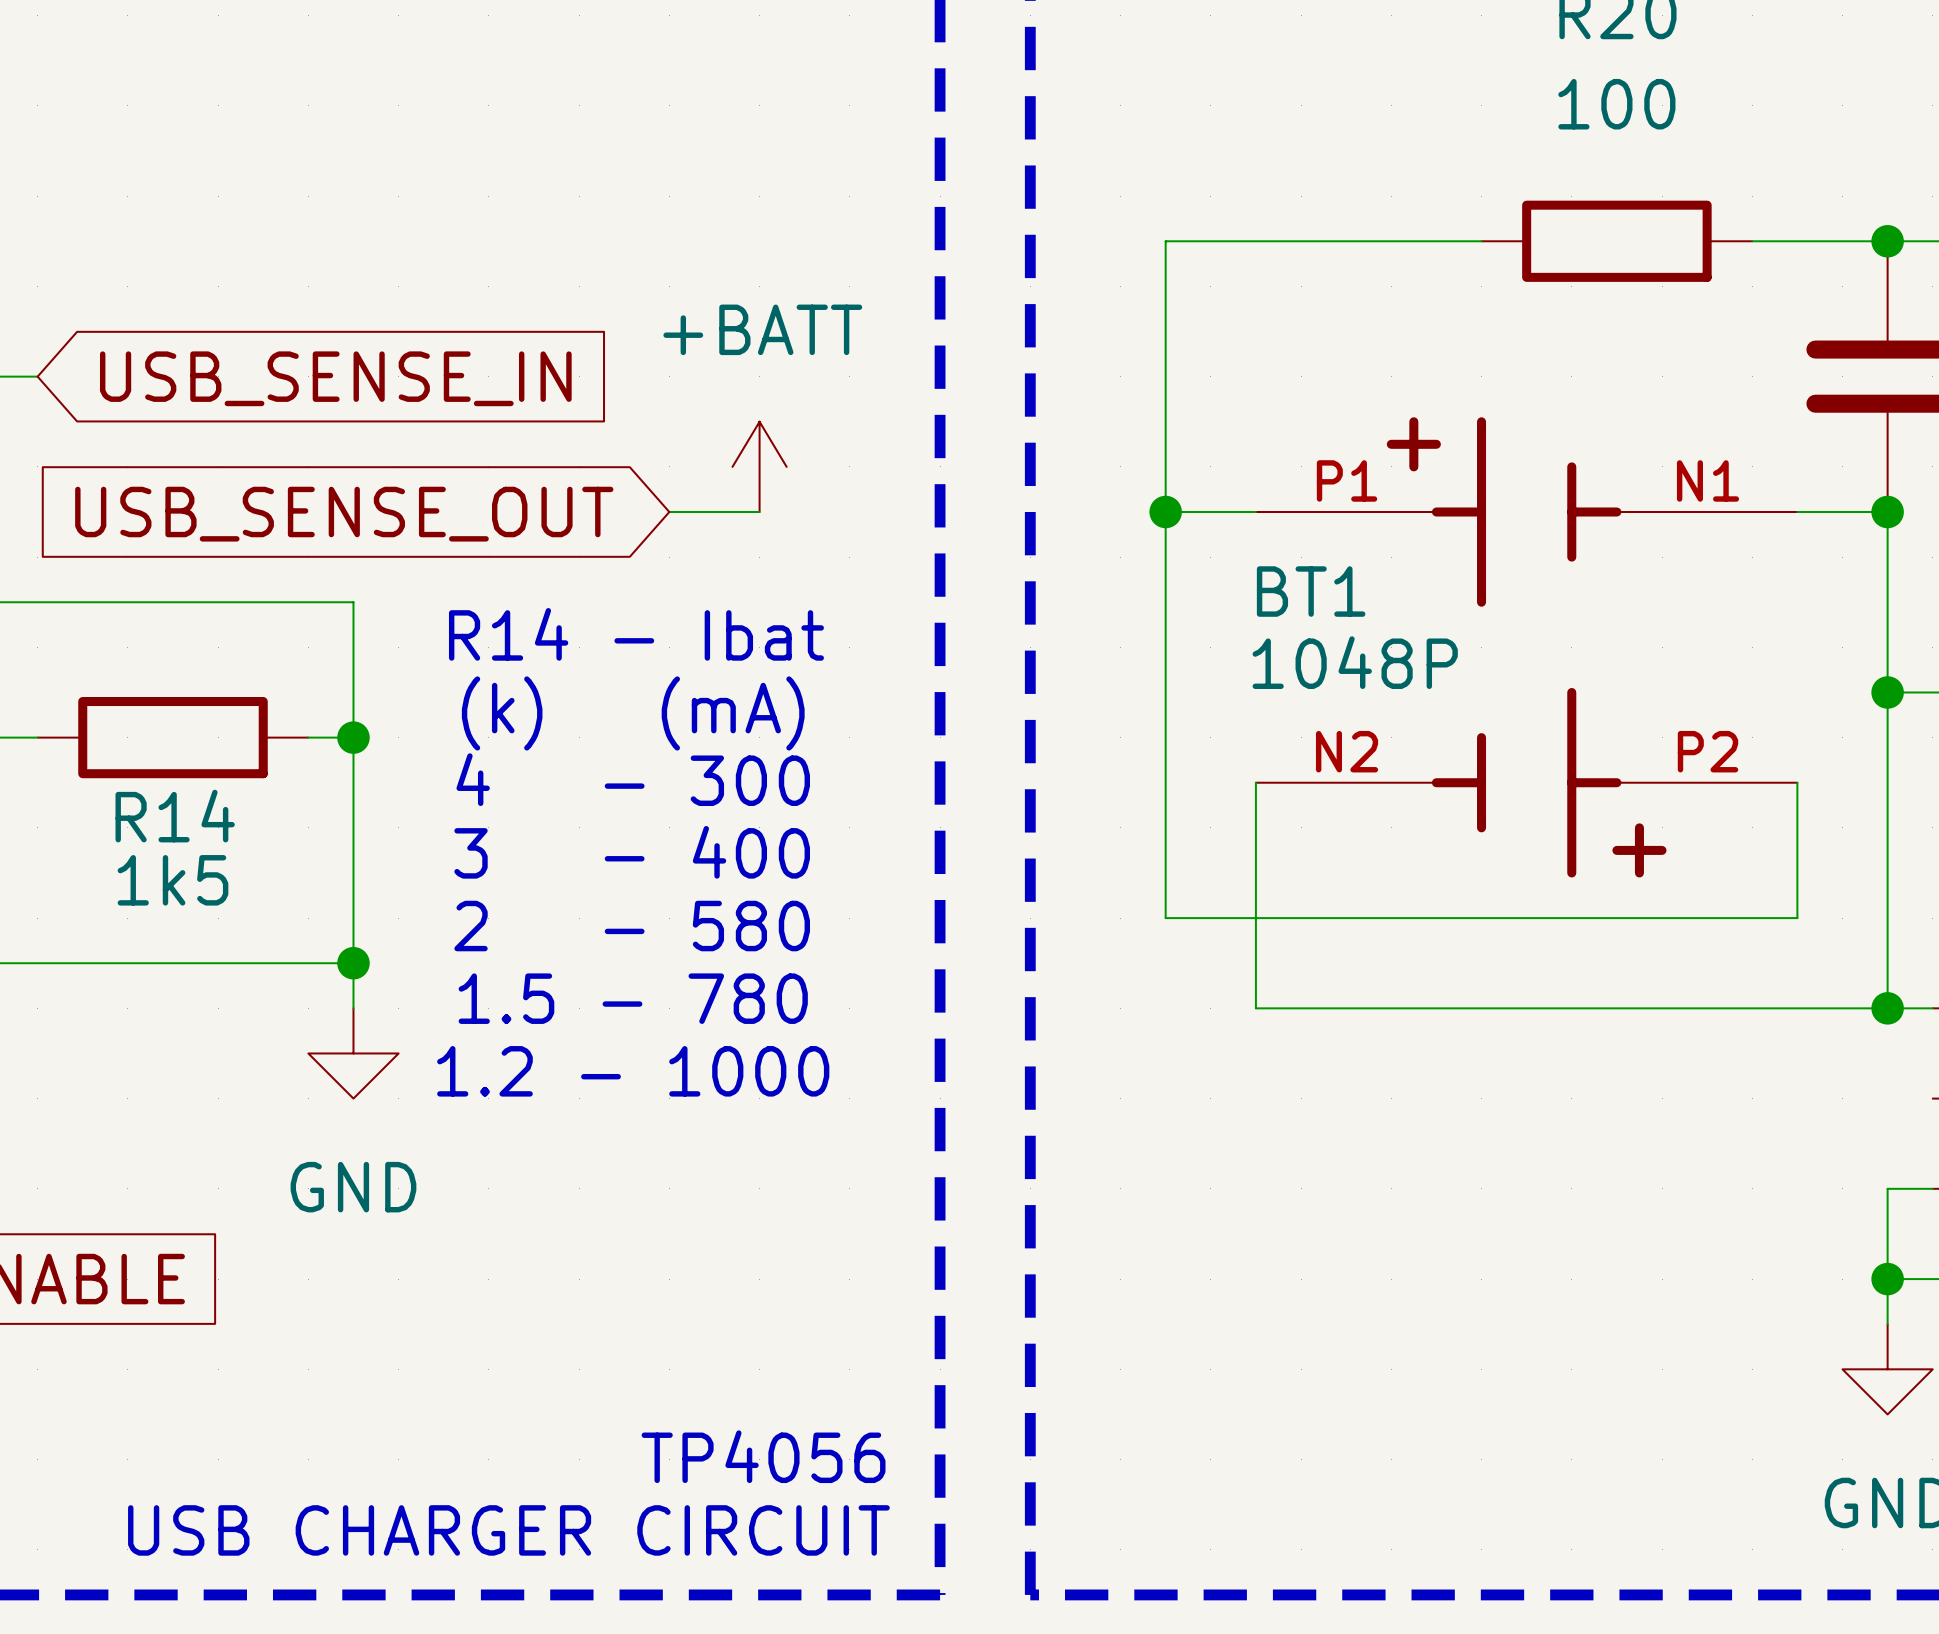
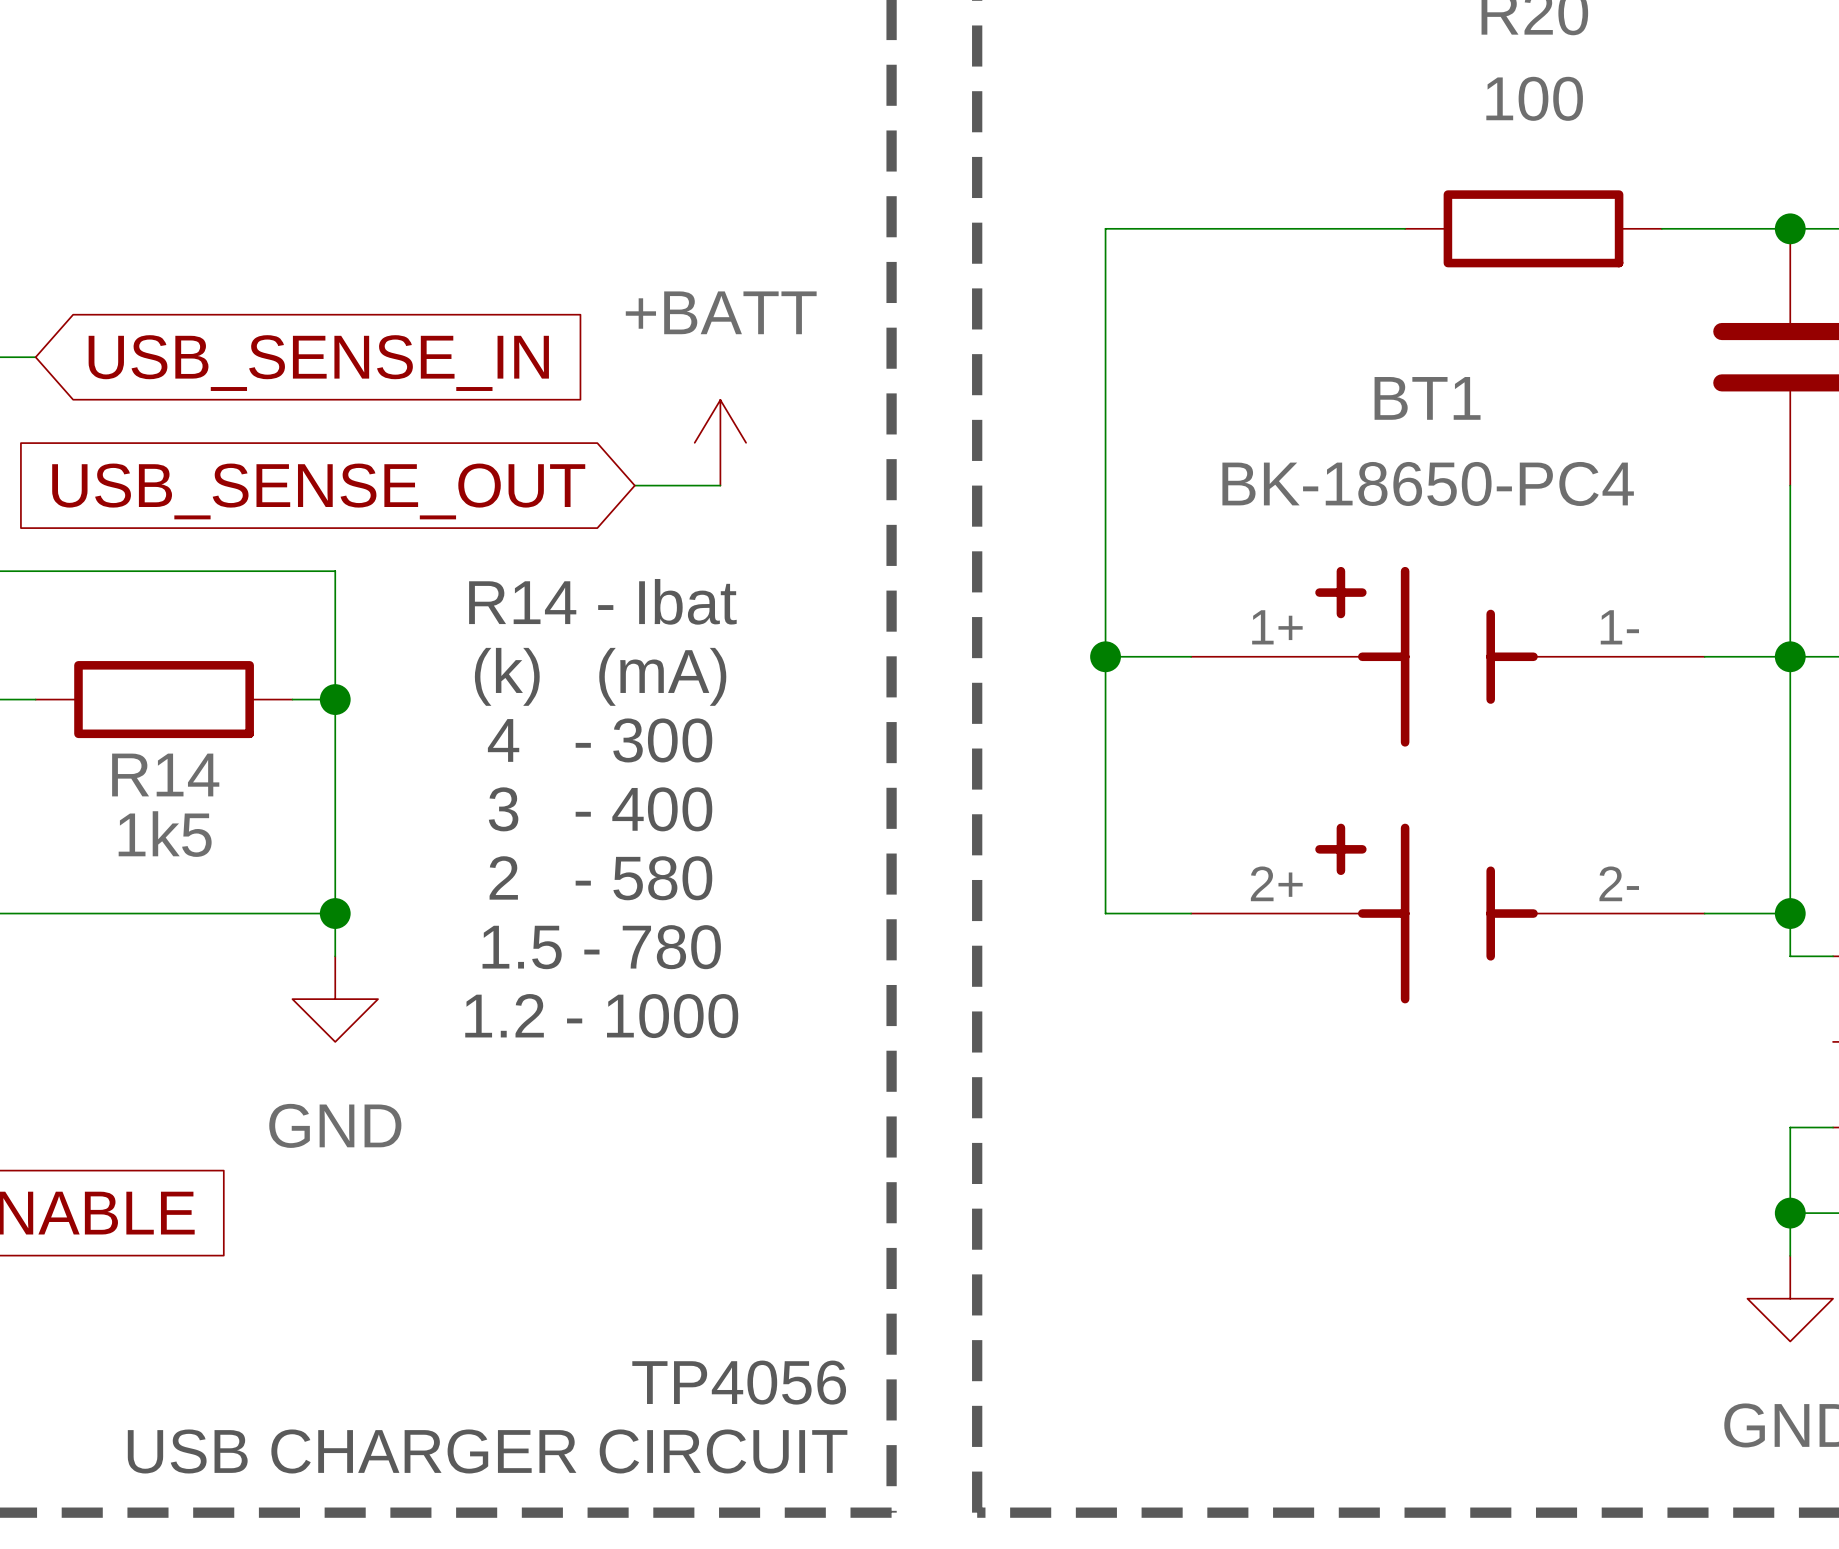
BT1 symbol: [1255, 417, 1798, 878] -> [1191, 566, 1705, 1004]
wire: (1165, 512) (1255, 512) -> (1105, 656) (1191, 656)
junction position: (1165, 512) -> (1105, 656)
wire: (1797, 512) (1887, 512) -> (1704, 656) (1790, 656)
junction: (1887, 512) -> none
BT1 name position: BT1 (1311, 591) -> BT1 (1427, 398)
BT1 value: 1048P (1355, 662) -> BK-18650-PC4 (1428, 483)
wire: (1255, 782) (1255, 1008) (1887, 1008) -> none
wire: (1797, 782) (1797, 918) (1165, 918) -> (1191, 913) (1105, 913) (1105, 870)
wire: none -> (1704, 913) (1790, 913)
junction position: (1887, 1008) -> (1790, 913)

